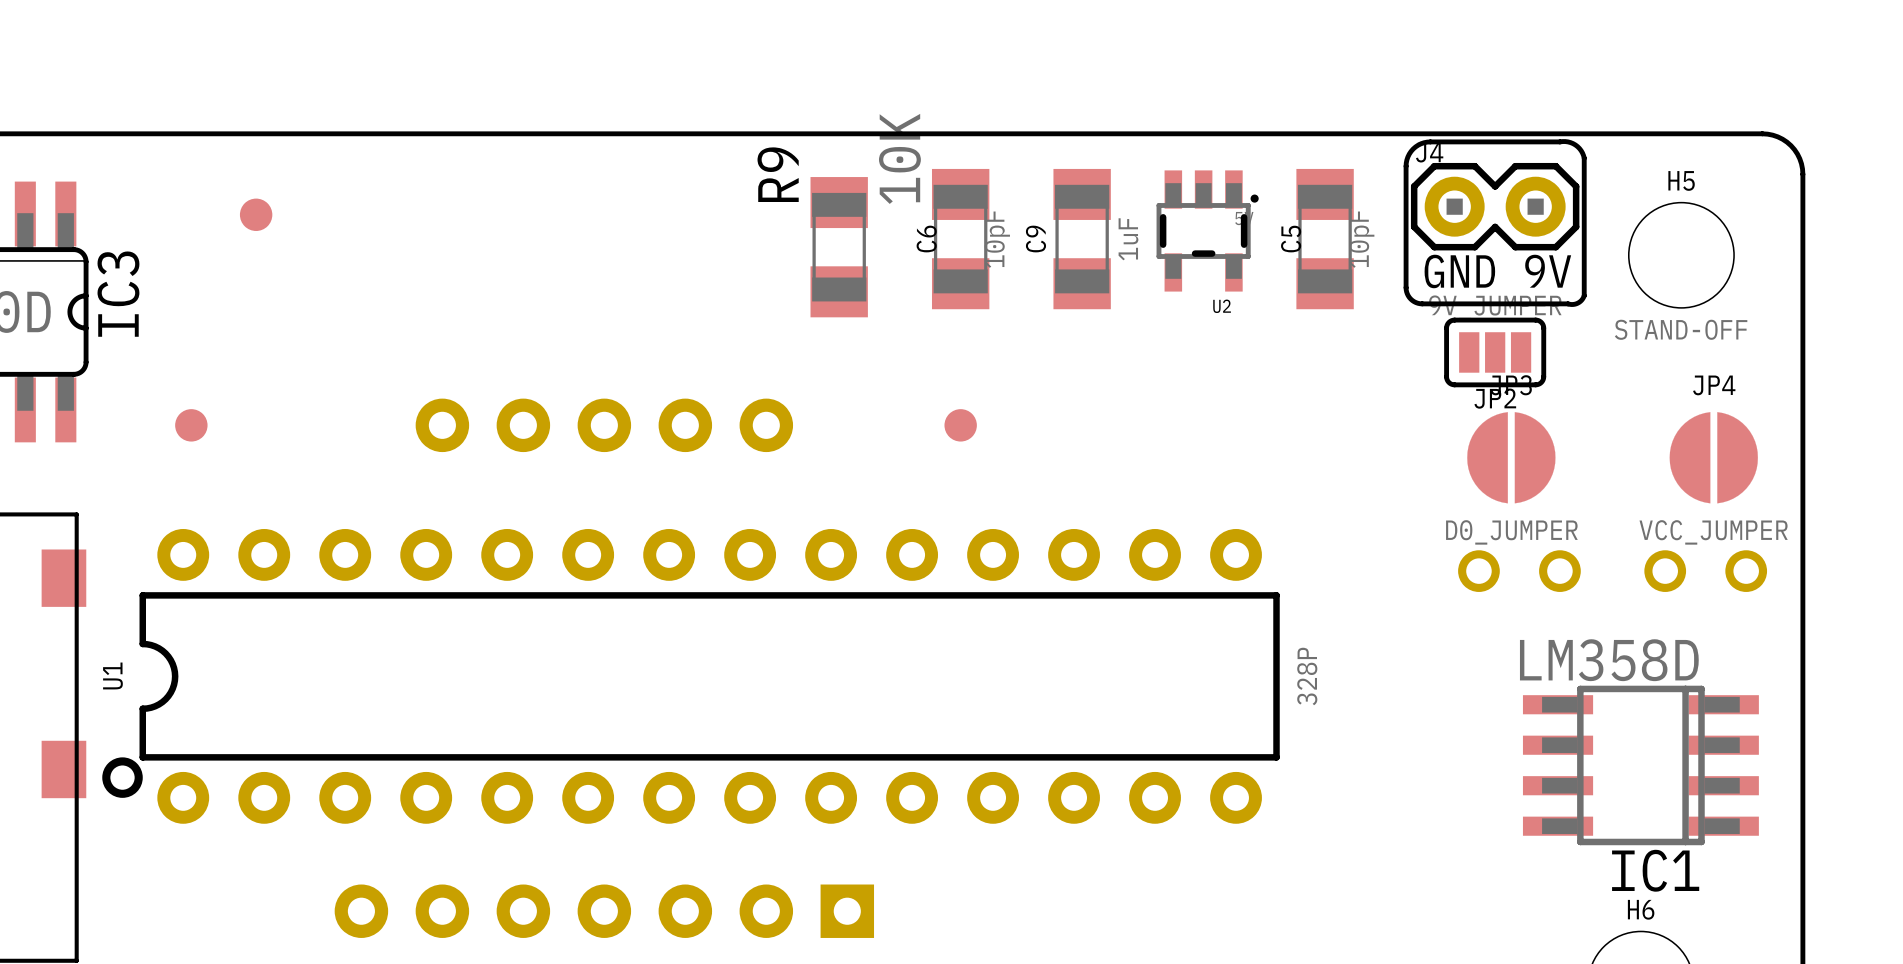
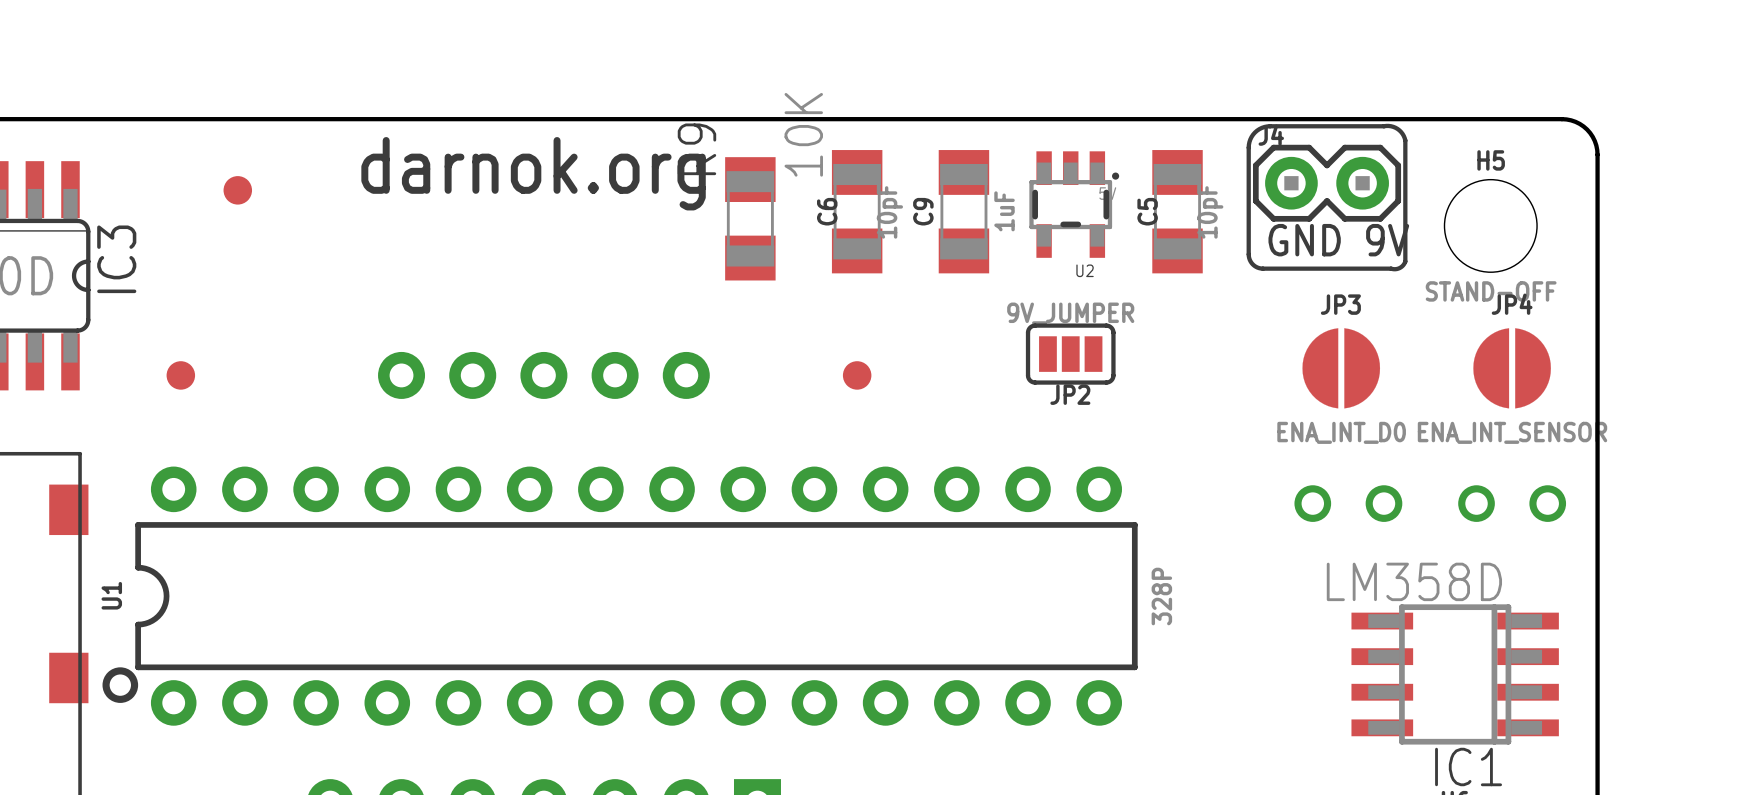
text: none -> darnok.org (533, 173)
JP2 position: (1495, 352) -> (1070, 354)
JP3 position: (1511, 457) -> (1341, 368)
JP4 position: (1713, 457) -> (1512, 368)
JP3 value: D0_JUMPER (1511, 532) -> ENA_INT_D0 (1341, 432)
JP4 value: VCC_JUMPER (1713, 532) -> ENA_INT_SENSOR (1512, 432)

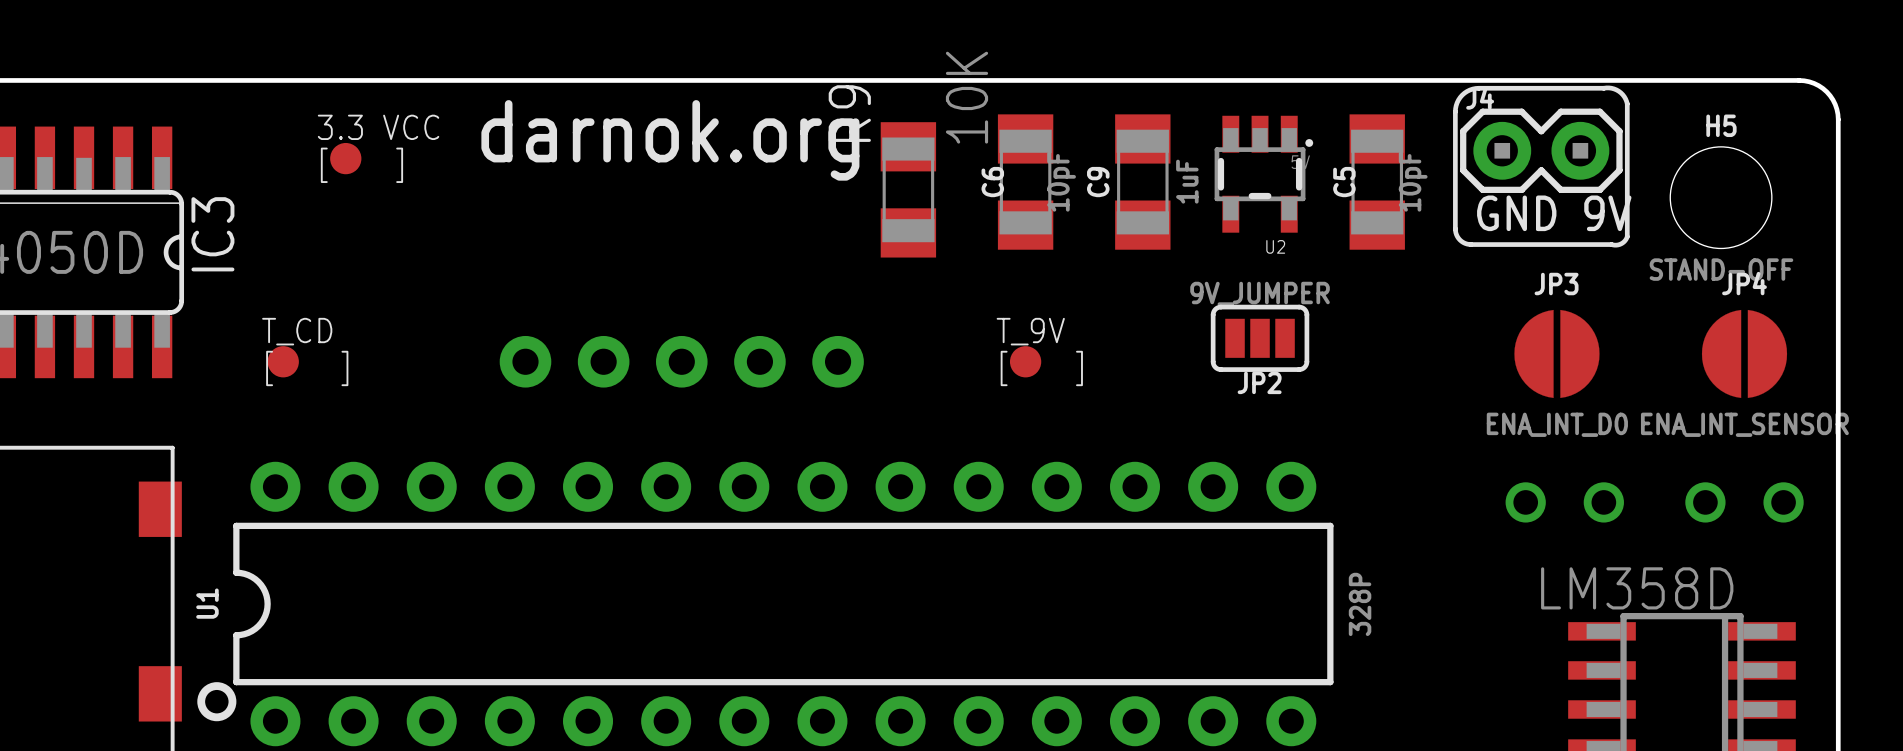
text: none -> 3.3 VCC (378, 127)
text: none -> [ ] (361, 165)
text: none -> T_CD (297, 331)
text: none -> T_9V (1030, 331)
text: none -> [ ] (307, 368)
text: none -> [ ] (1041, 368)

